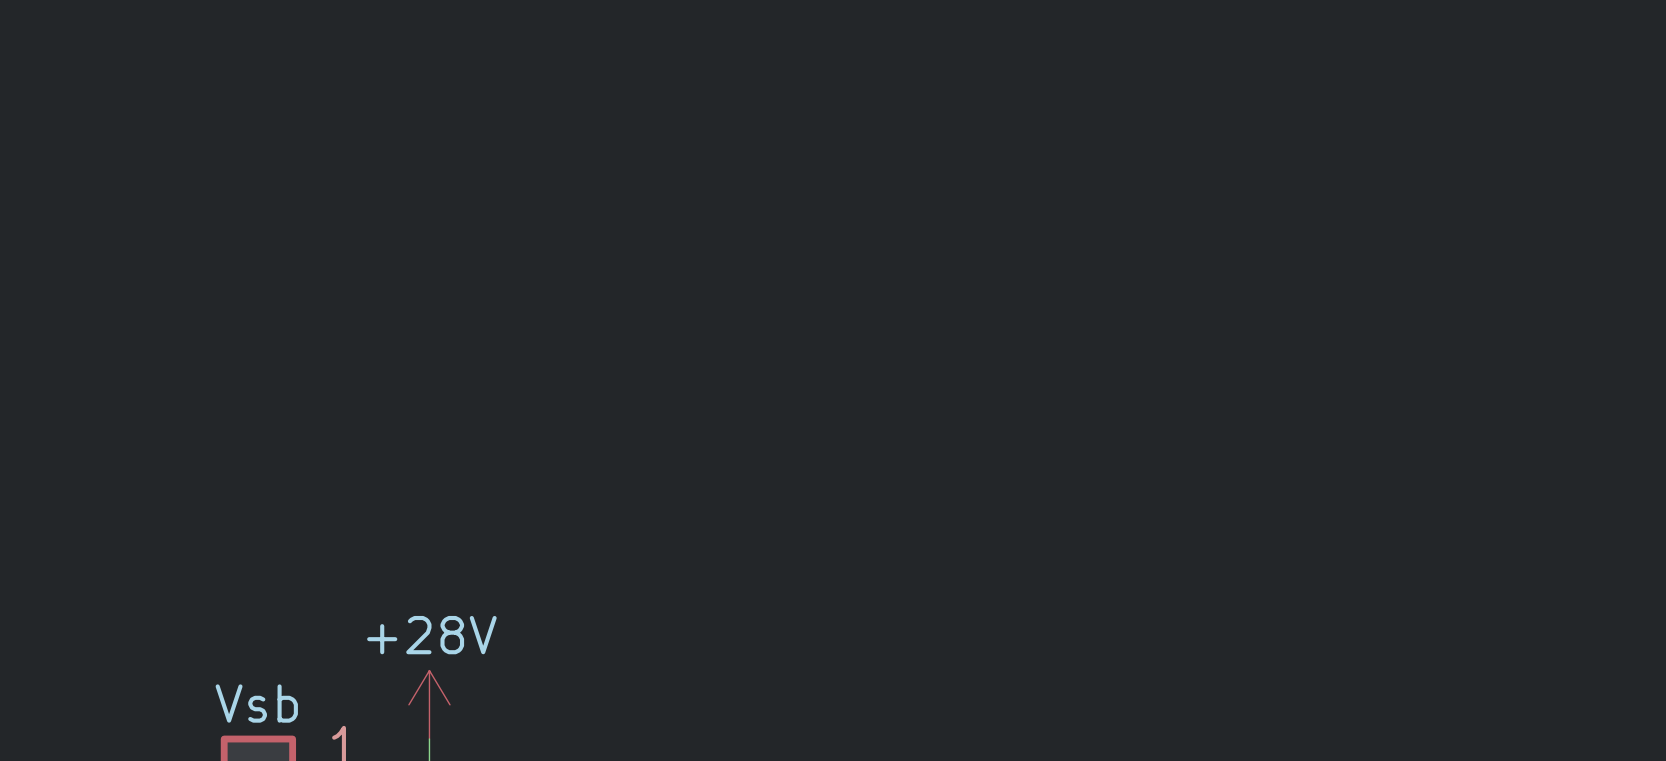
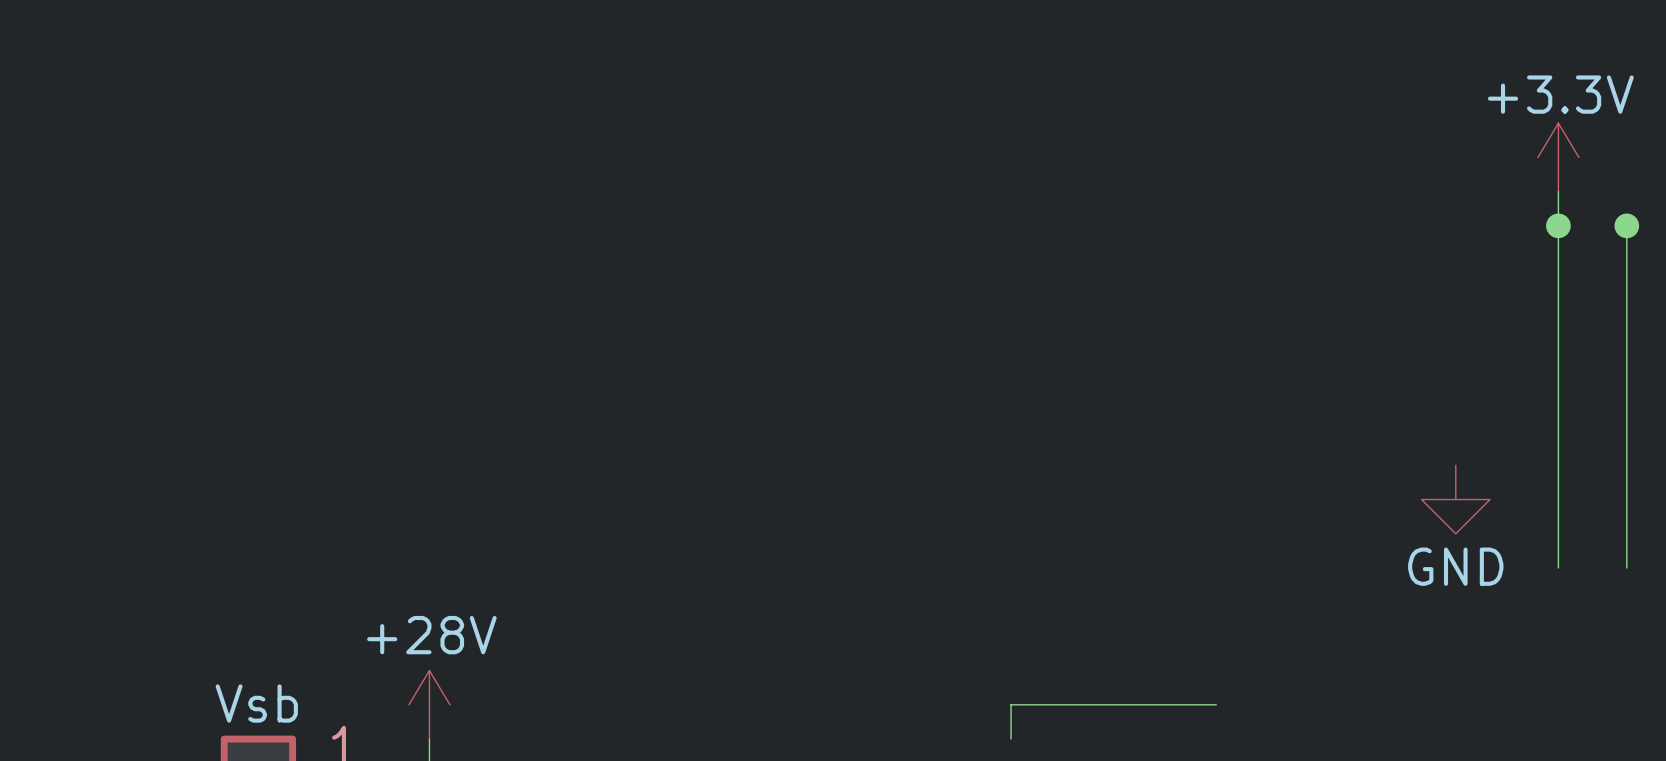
power symbol: none -> +3.3V (1558, 157)
wire: none -> (1558, 191) (1558, 567)
junction: none -> (1558, 225)
wire: none -> (1626, 225) (1626, 567)
junction: none -> (1626, 225)
power symbol: none -> GND (1455, 499)
wire: none -> (1216, 704) (1011, 704) (1011, 739)

